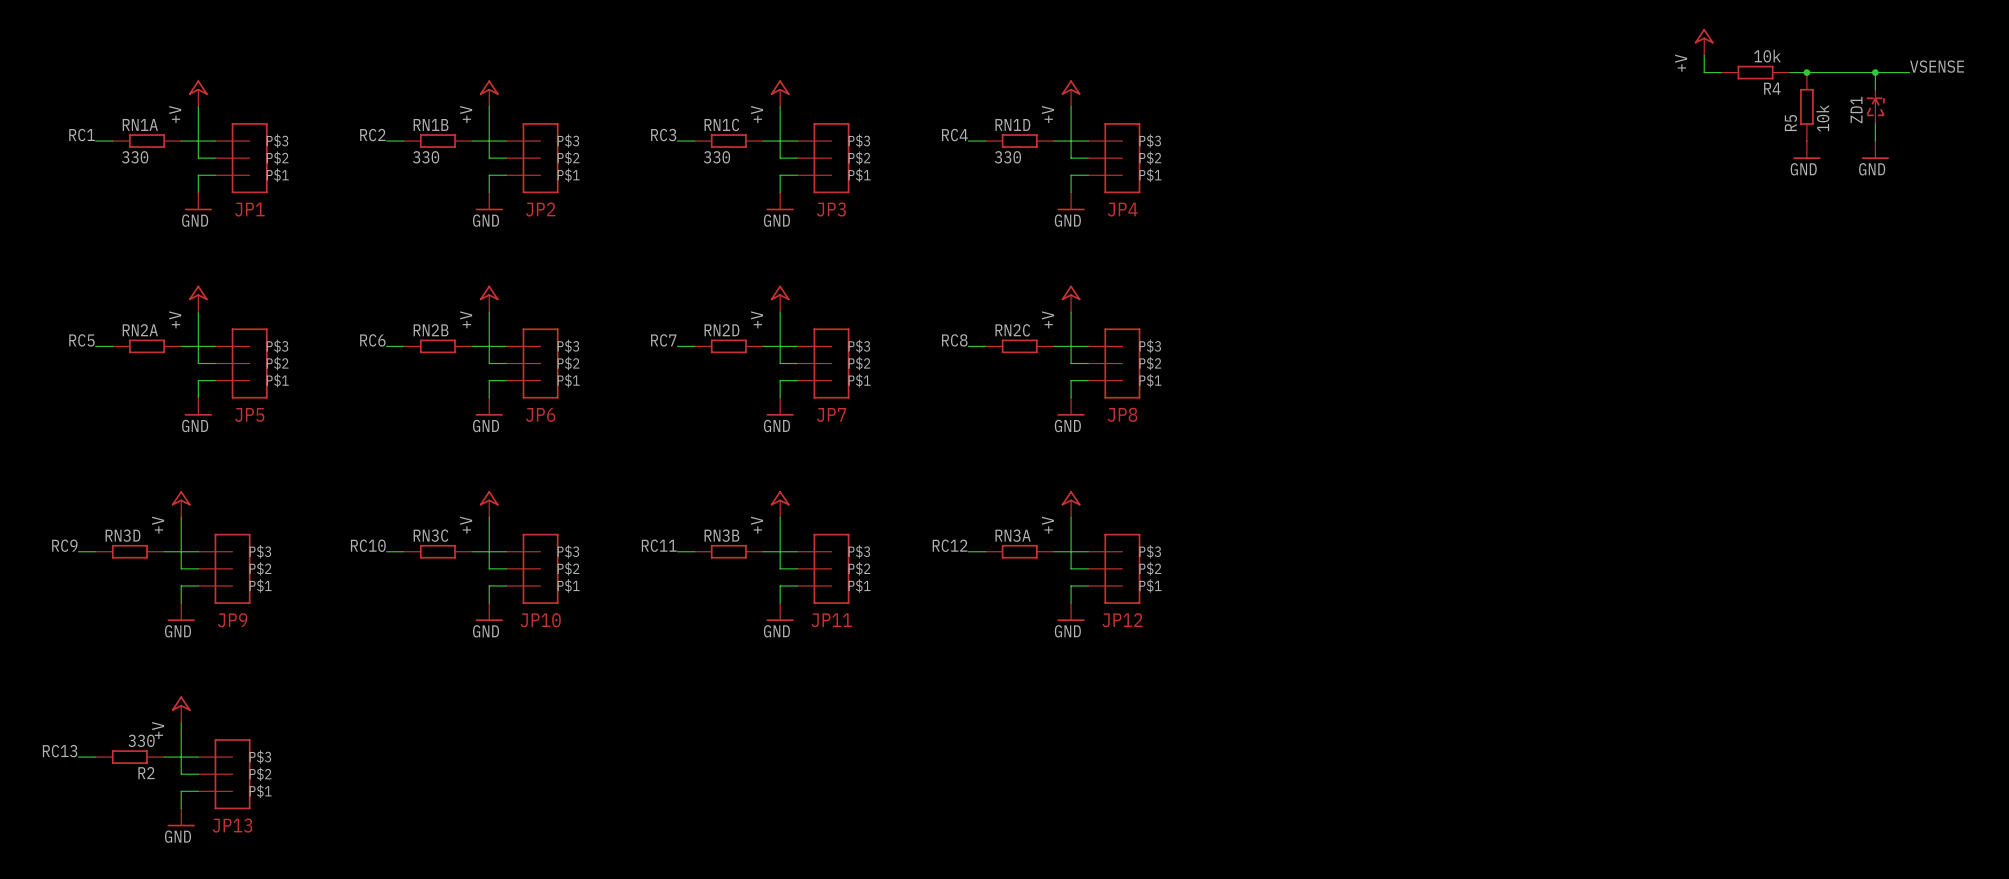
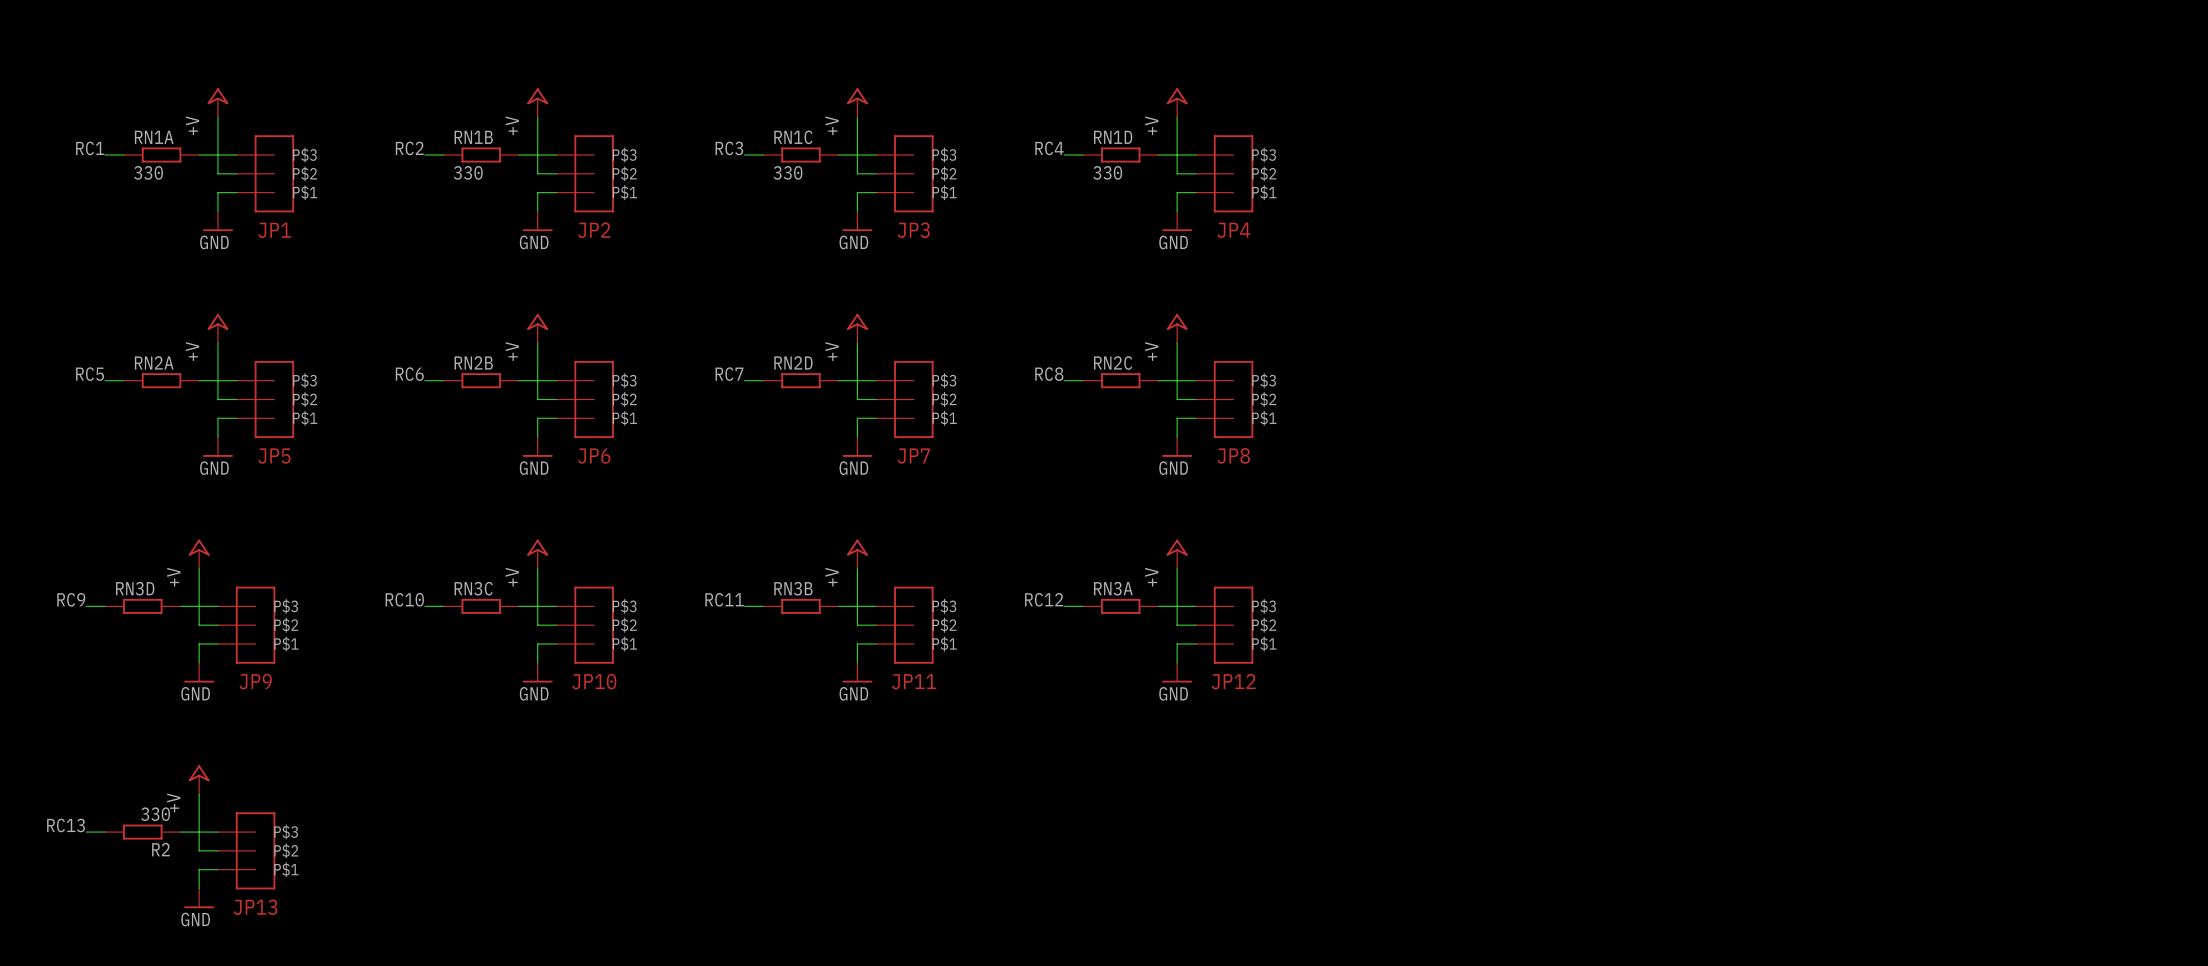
power symbol: +V (1704, 42) -> none
wire: (1704, 55) (1704, 72) (1721, 72) -> none
label: VSENSE (1937, 66) -> none
R4: 10k (1755, 72) -> none
wire: (1789, 72) (1909, 72) -> none
junction: (1806, 72) -> none
wire: (1875, 72) (1875, 89) -> none
junction: (1875, 72) -> none
R5: 10k (1806, 106) -> none
ZD1: (1875, 106) -> none
wire: (1875, 123) (1875, 141) -> none
power symbol: GND (1806, 150) -> none
power symbol: GND (1875, 150) -> none

